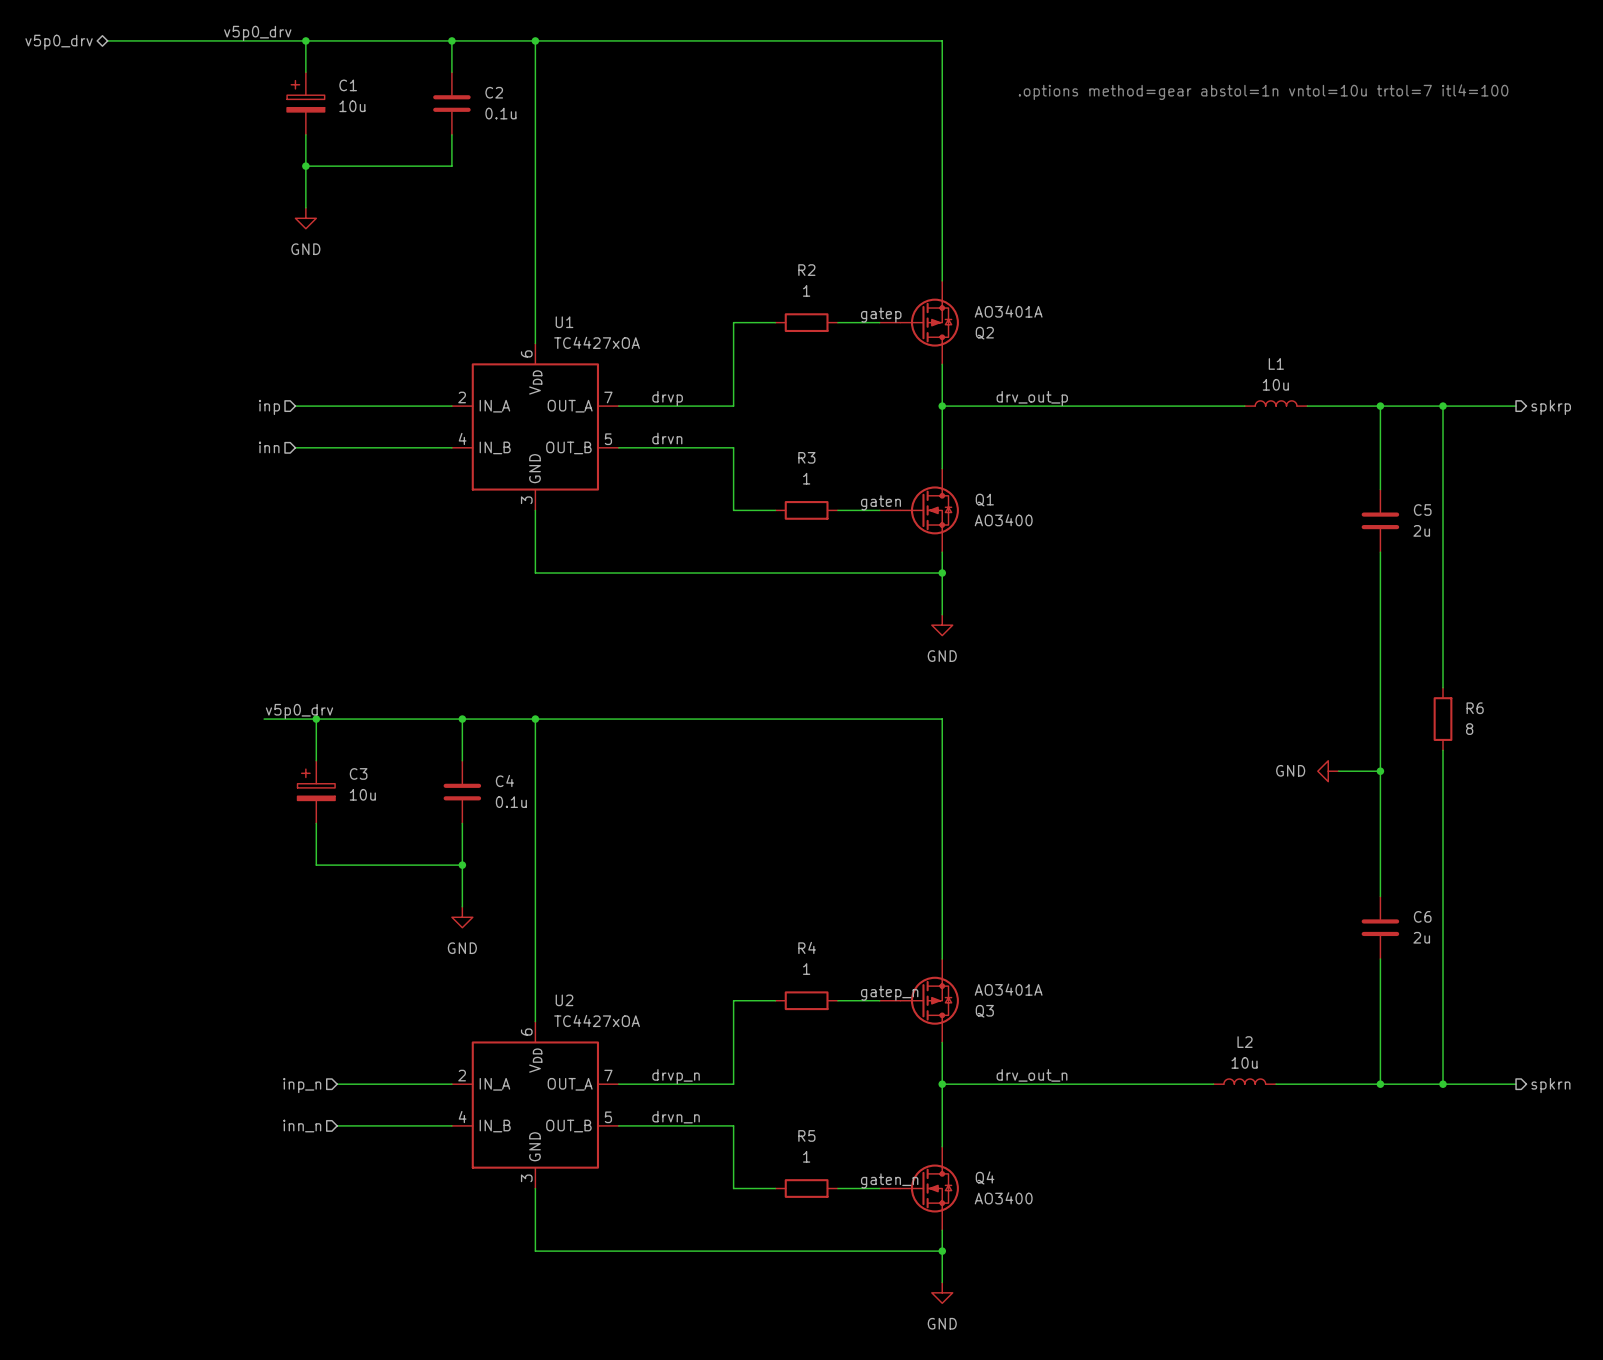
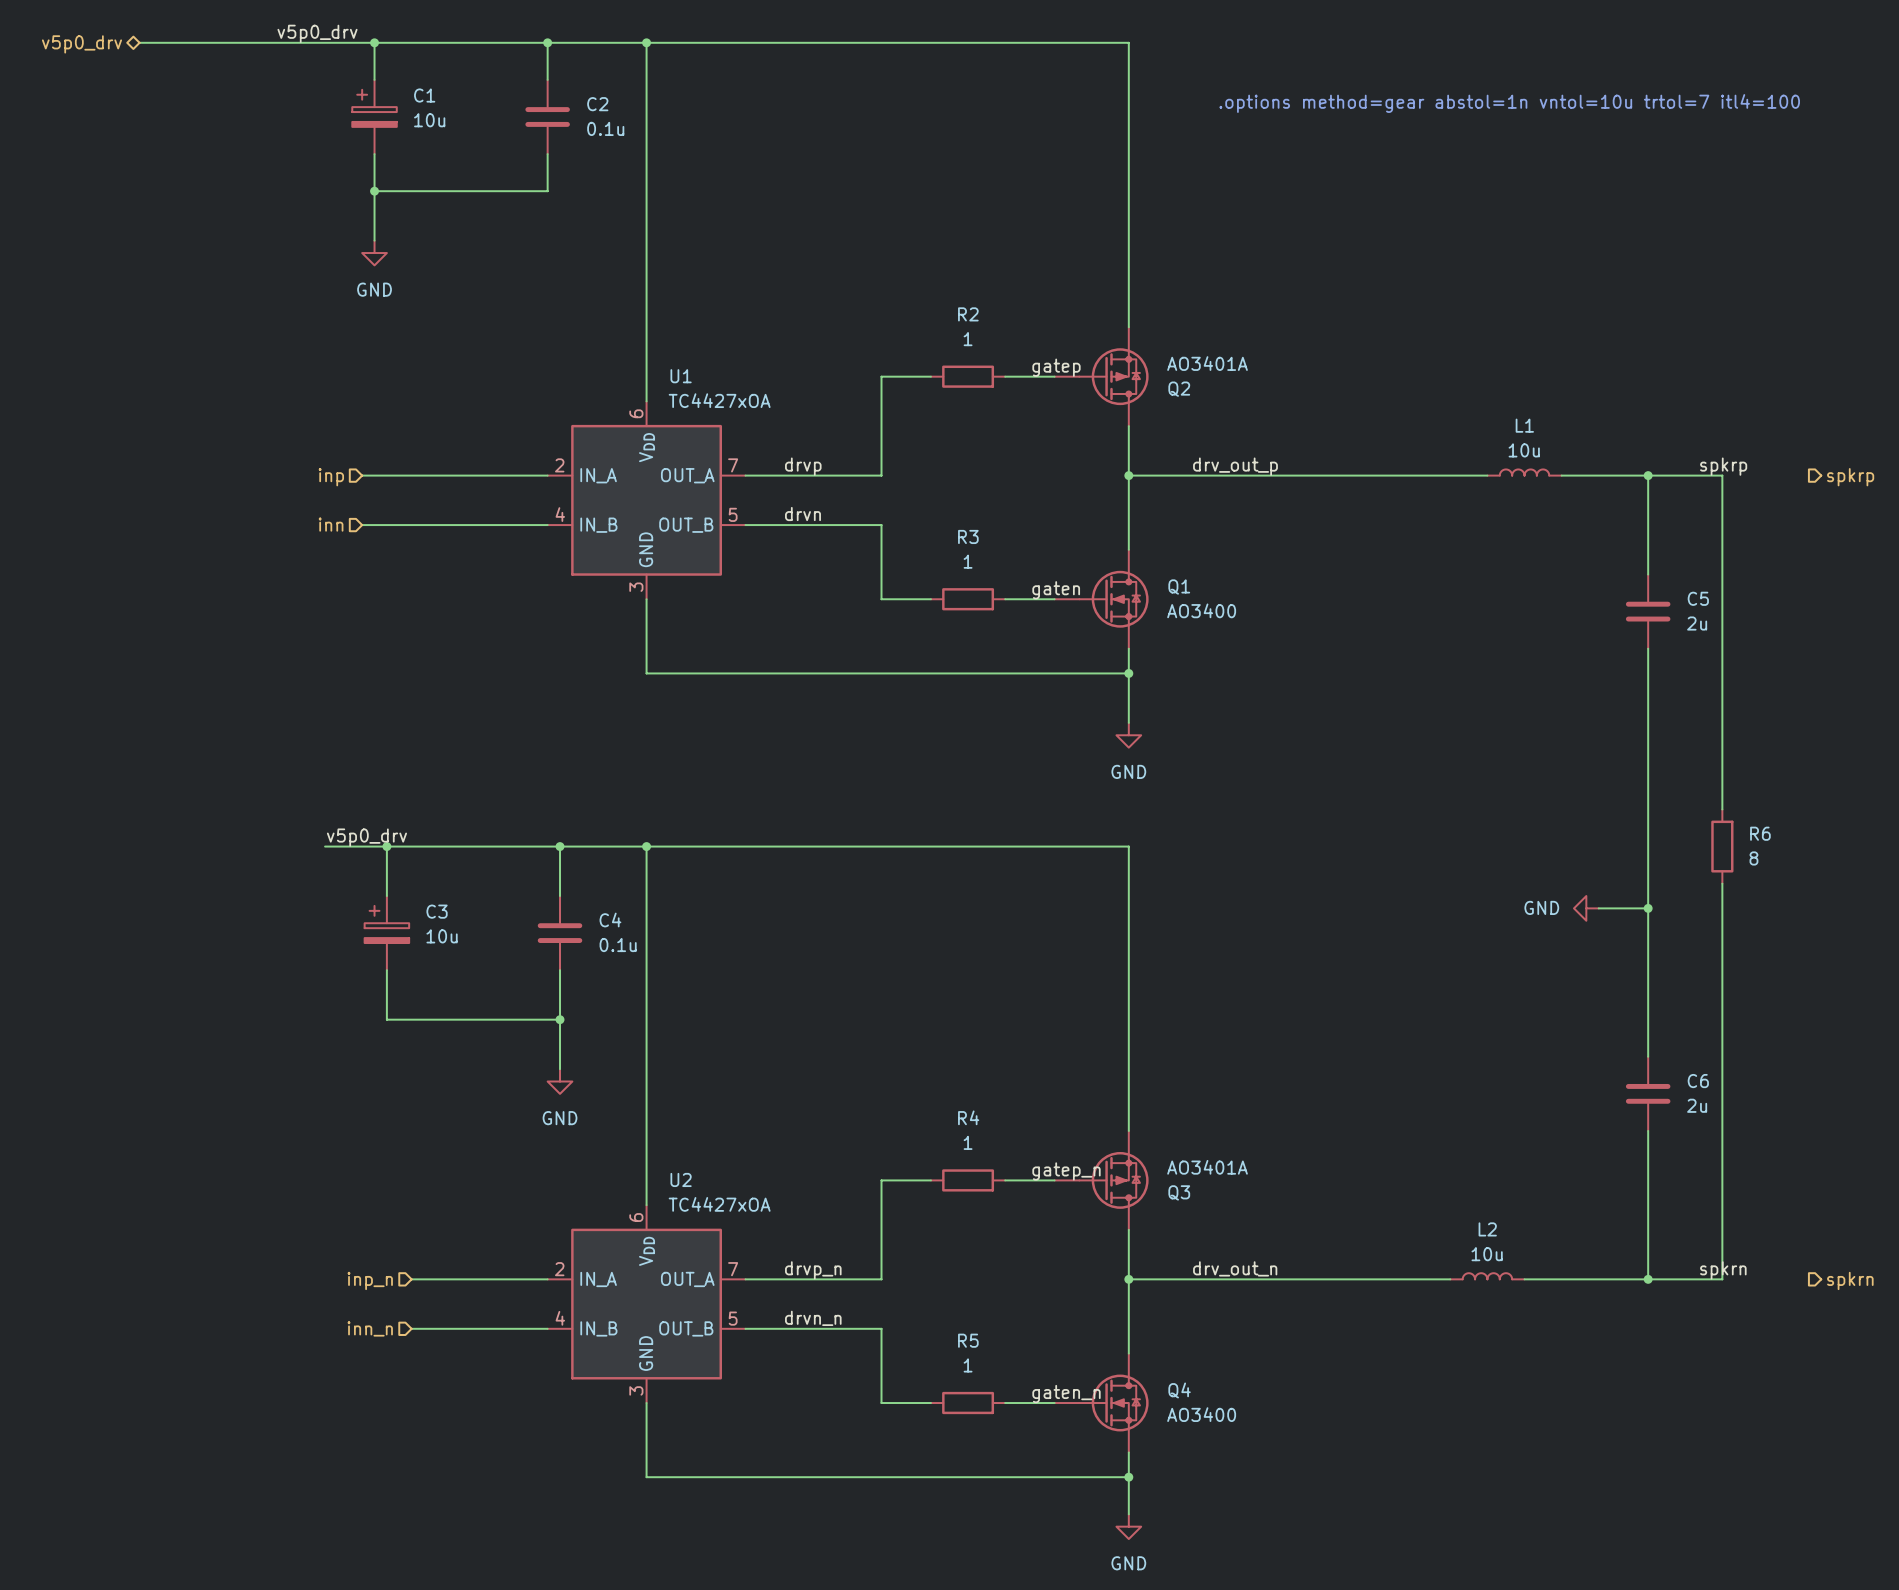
label: none -> spkrp (1723, 466)
wire: (1443, 406) (1516, 406) -> none
junction: (1443, 406) -> none
label: none -> spkrn (1723, 1270)
wire: (1443, 1084) (1516, 1084) -> none
junction: (1443, 1084) -> none

